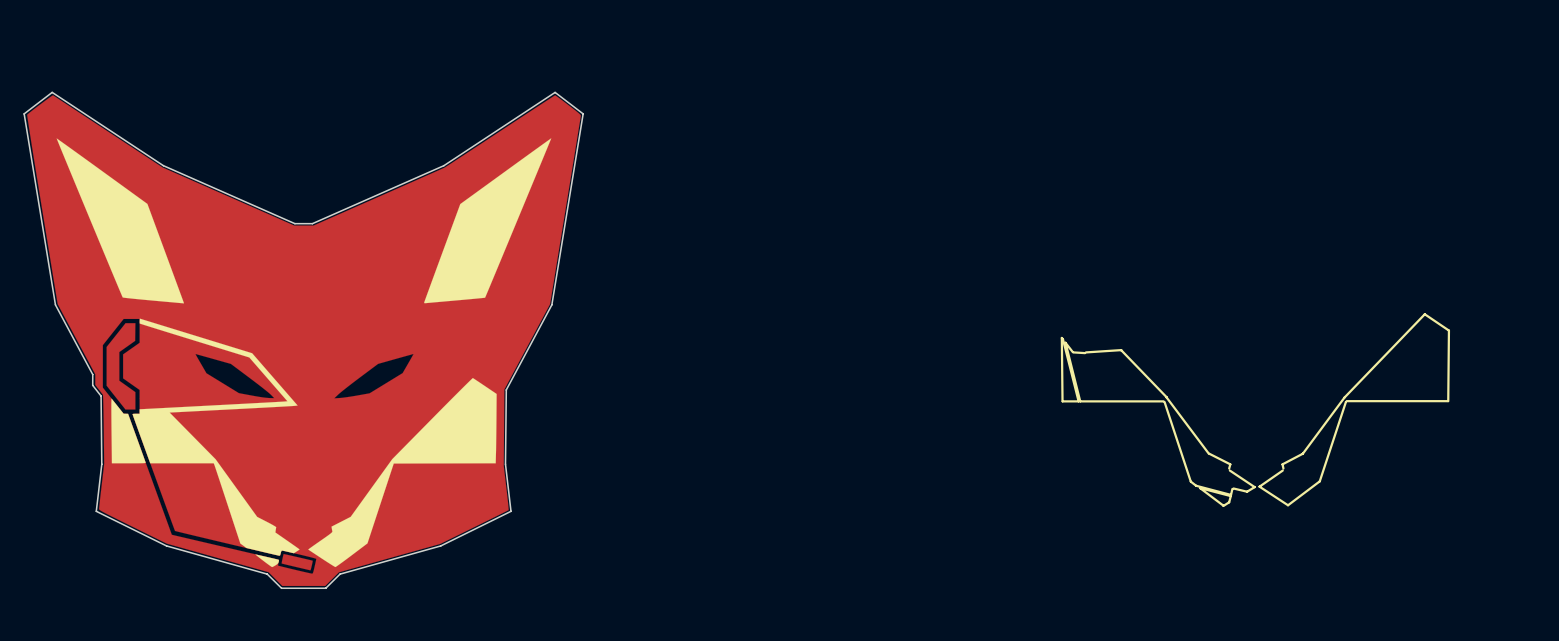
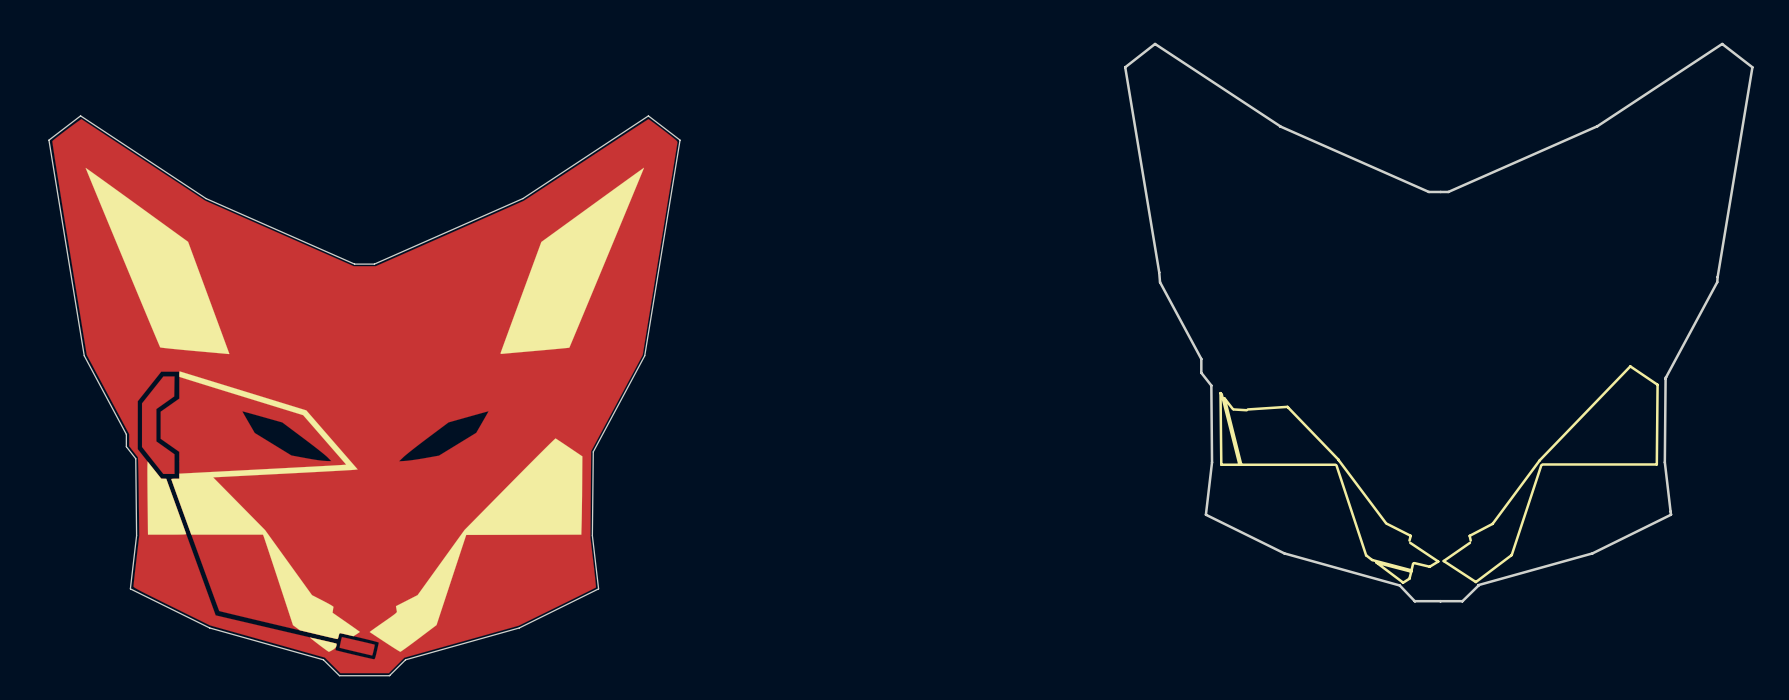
board edge: none -> (1280, 126) (1155, 43) (1125, 67) (1160, 282) (1201, 358) (1201, 372) (1211, 385) (1212, 462) (1205, 514) (1284, 553) (1399, 585) (1414, 601) (1462, 601) (1478, 585) (1592, 553) (1670, 514) (1664, 462) (1665, 377)
board edge: none -> (1280, 126) (1428, 191) (1448, 191) (1597, 126) (1722, 43) (1752, 67) (1717, 282) (1665, 377)

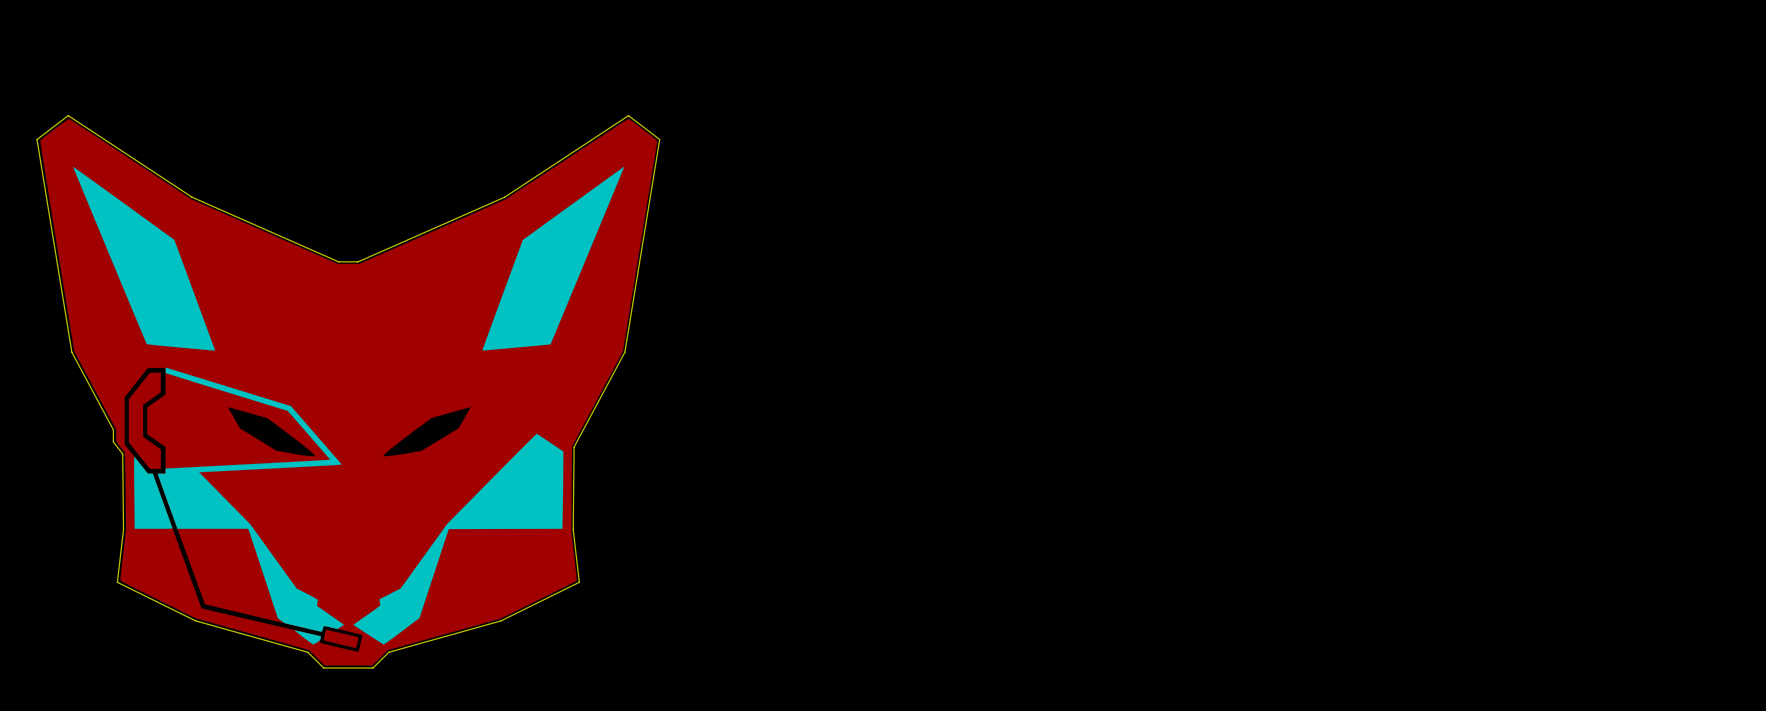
board edge: (1280, 126) (1155, 43) (1125, 67) (1160, 282) (1201, 358) (1201, 372) (1211, 385) (1212, 462) (1205, 514) (1284, 553) (1399, 585) (1414, 601) (1462, 601) (1478, 585) (1592, 553) (1670, 514) (1664, 462) (1665, 377) -> none
board edge: (1280, 126) (1428, 191) (1448, 191) (1597, 126) (1722, 43) (1752, 67) (1717, 282) (1665, 377) -> none
line: (1232, 409) (1224, 398) (1241, 464) (1335, 464) -> none
line: (1233, 409) (1246, 410) -> none
line: (1247, 409) (1287, 406) (1338, 459) (1386, 523) -> none
line: (1221, 464) (1220, 393) (1239, 464) (1221, 464) -> none
line: (1542, 464) (1656, 464) -> none
line: (1656, 464) (1657, 384) (1630, 366) (1539, 460) (1492, 523) (1469, 535) (1470, 540) -> none
line: (1336, 465) (1366, 555) (1372, 559) (1411, 570) (1413, 563) -> none
line: (1541, 465) (1511, 555) (1475, 582) (1443, 561) (1469, 542) -> none
line: (1387, 523) (1410, 535) (1409, 540) -> none
line: (1410, 542) (1438, 561) (1429, 566) (1414, 563) -> none
line: (1402, 582) (1376, 562) (1411, 571) (1409, 578) (1402, 582) -> none

